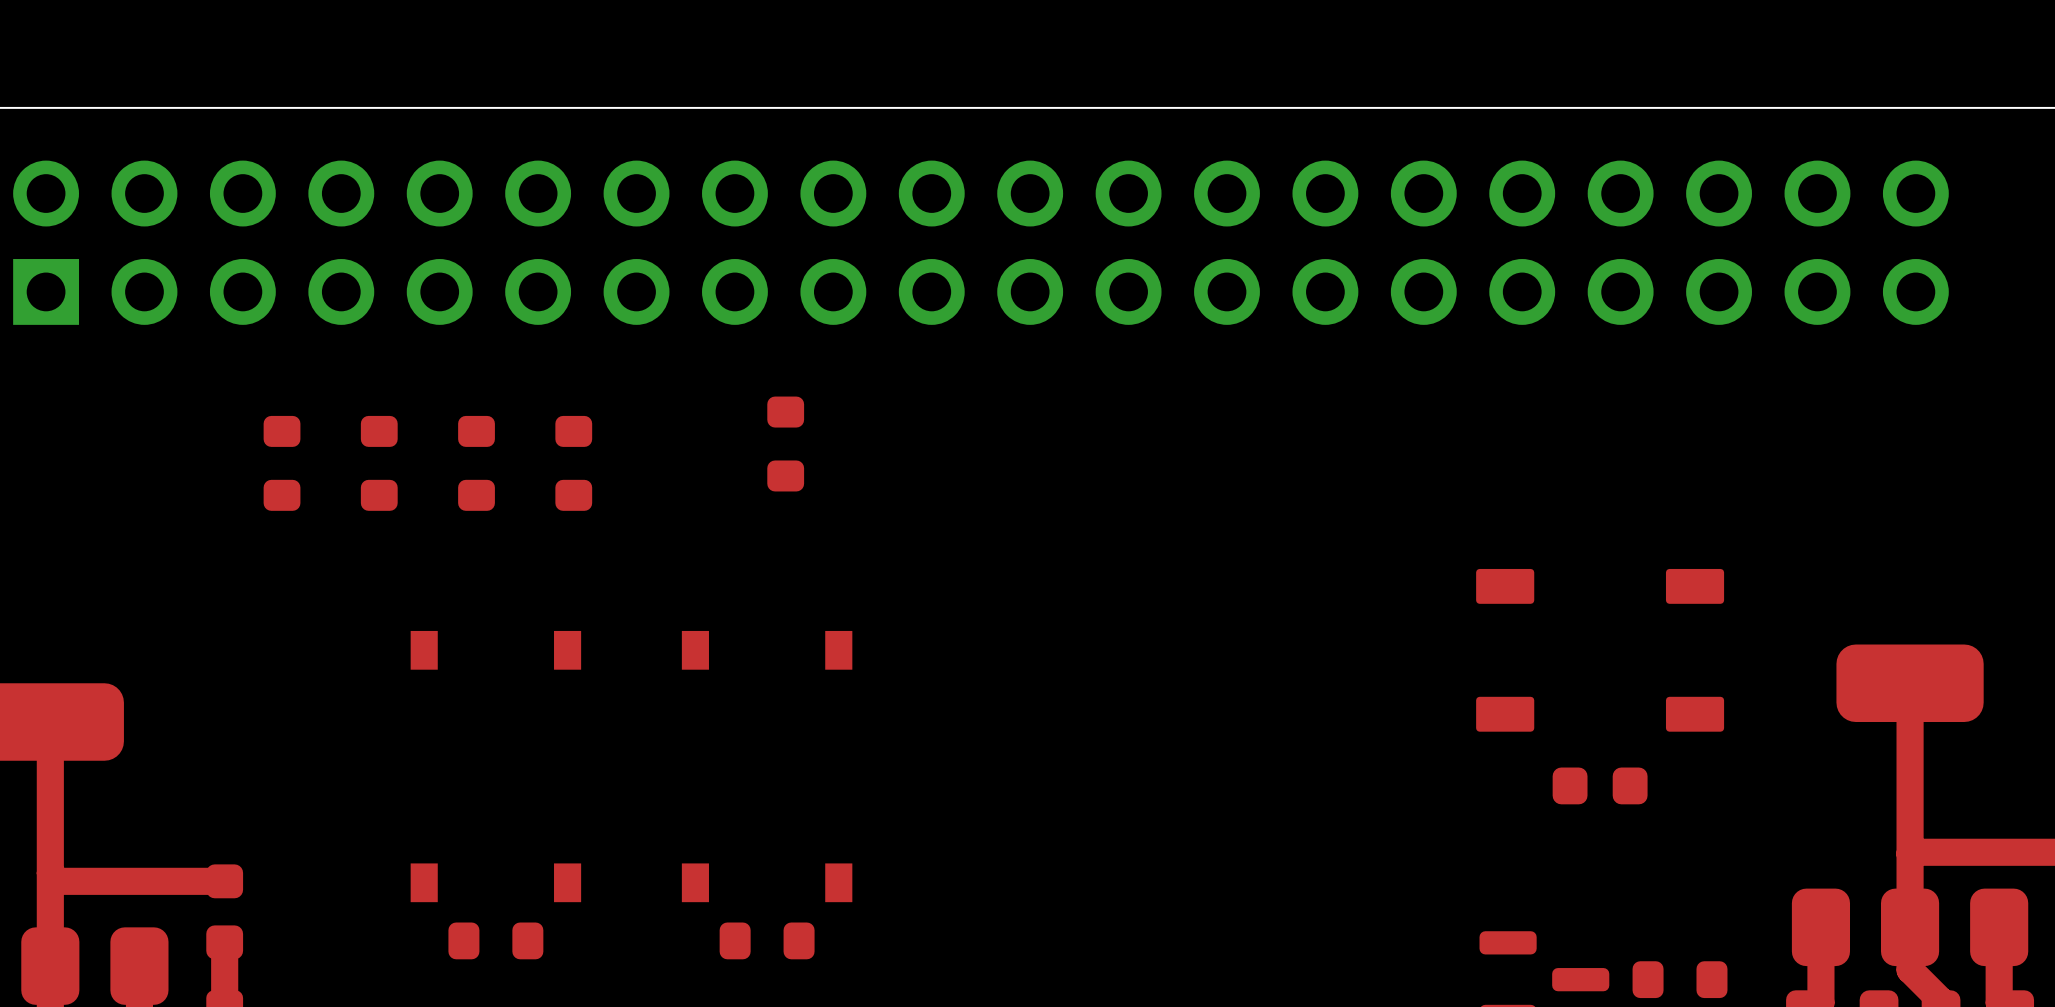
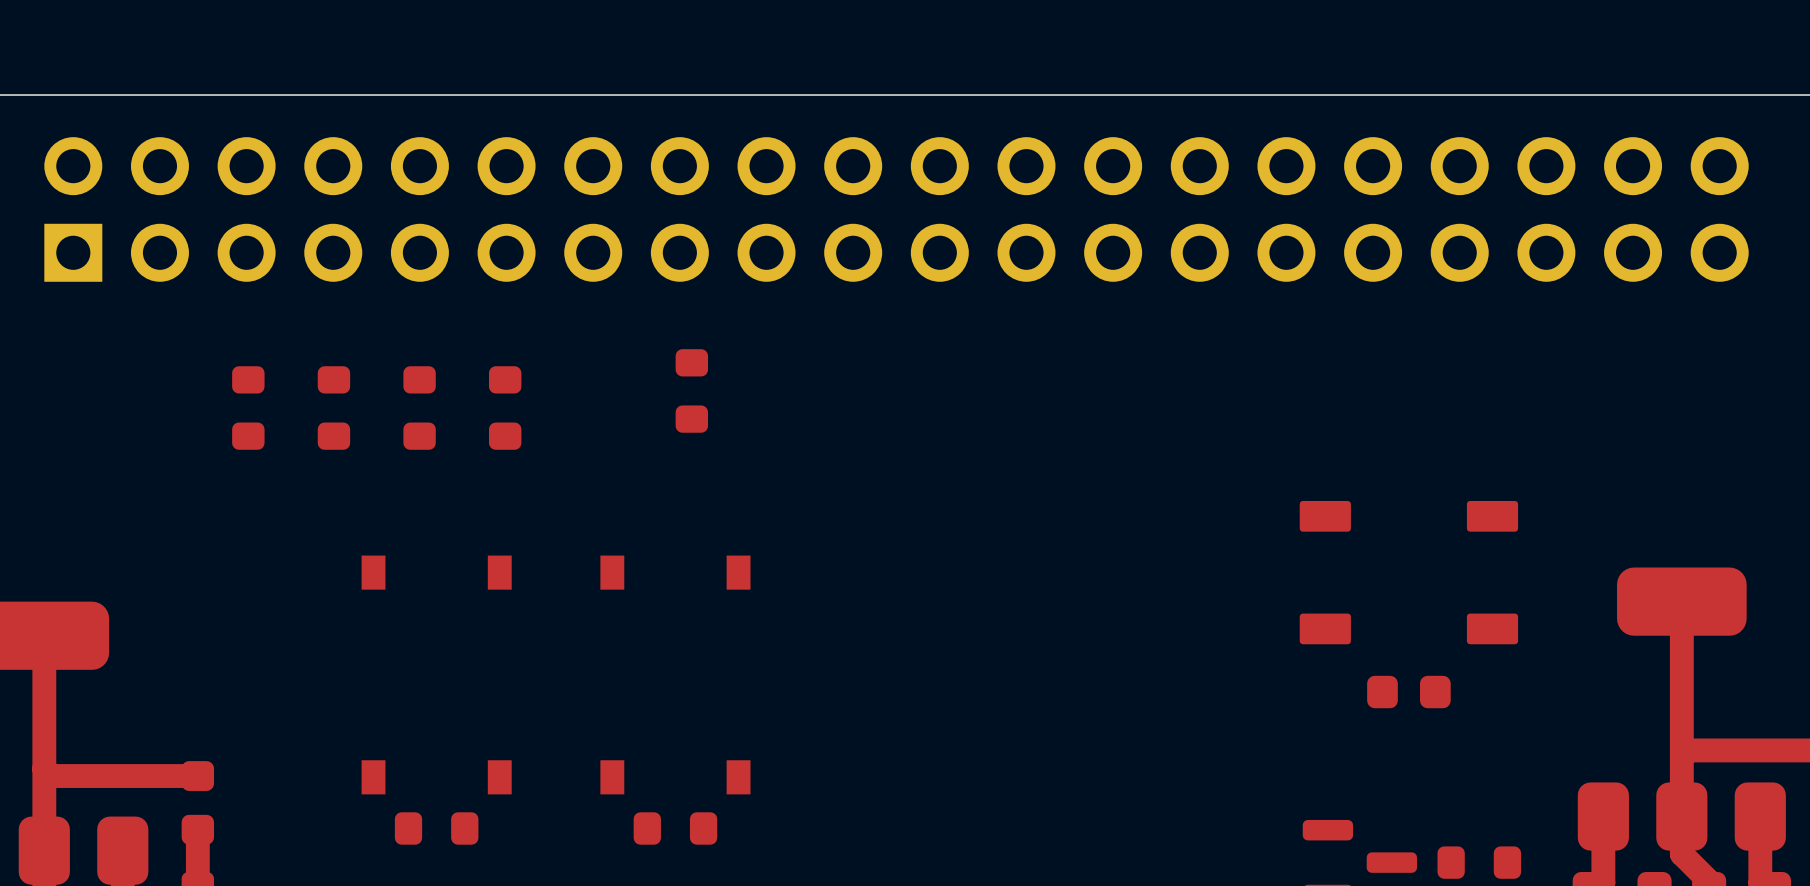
part position: (980, 242) -> (896, 209)

